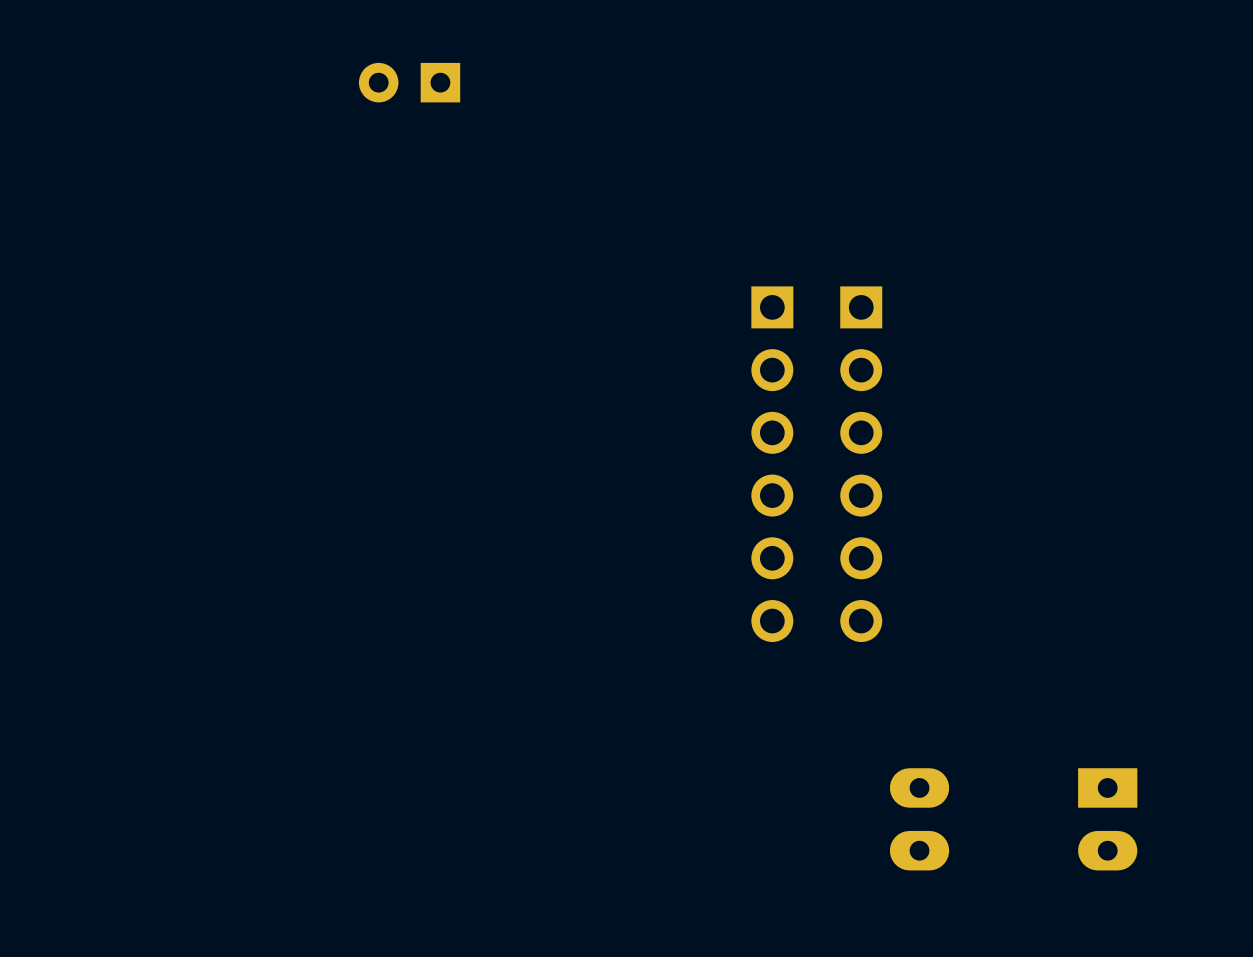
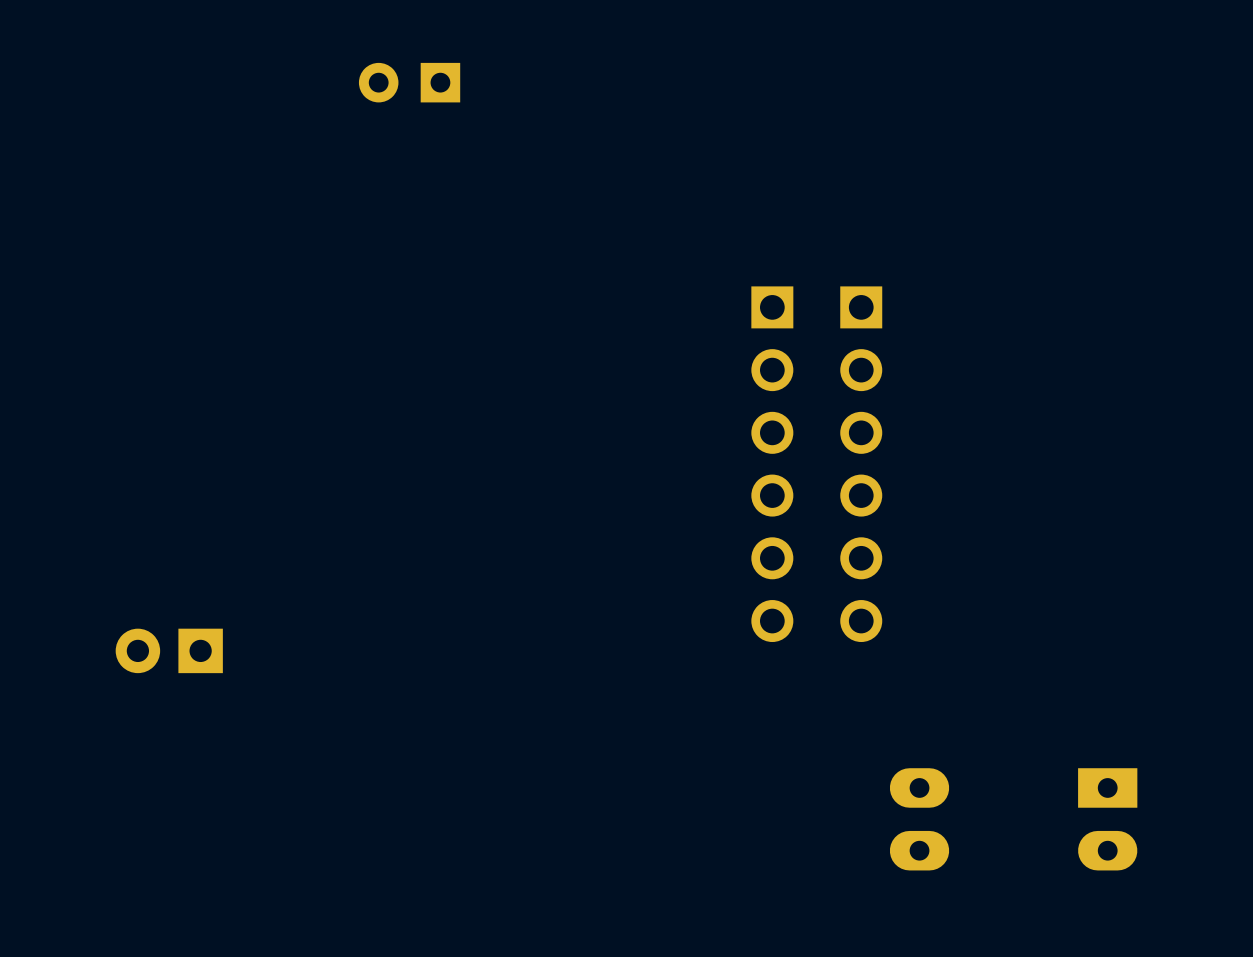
part: none -> (169, 650)

